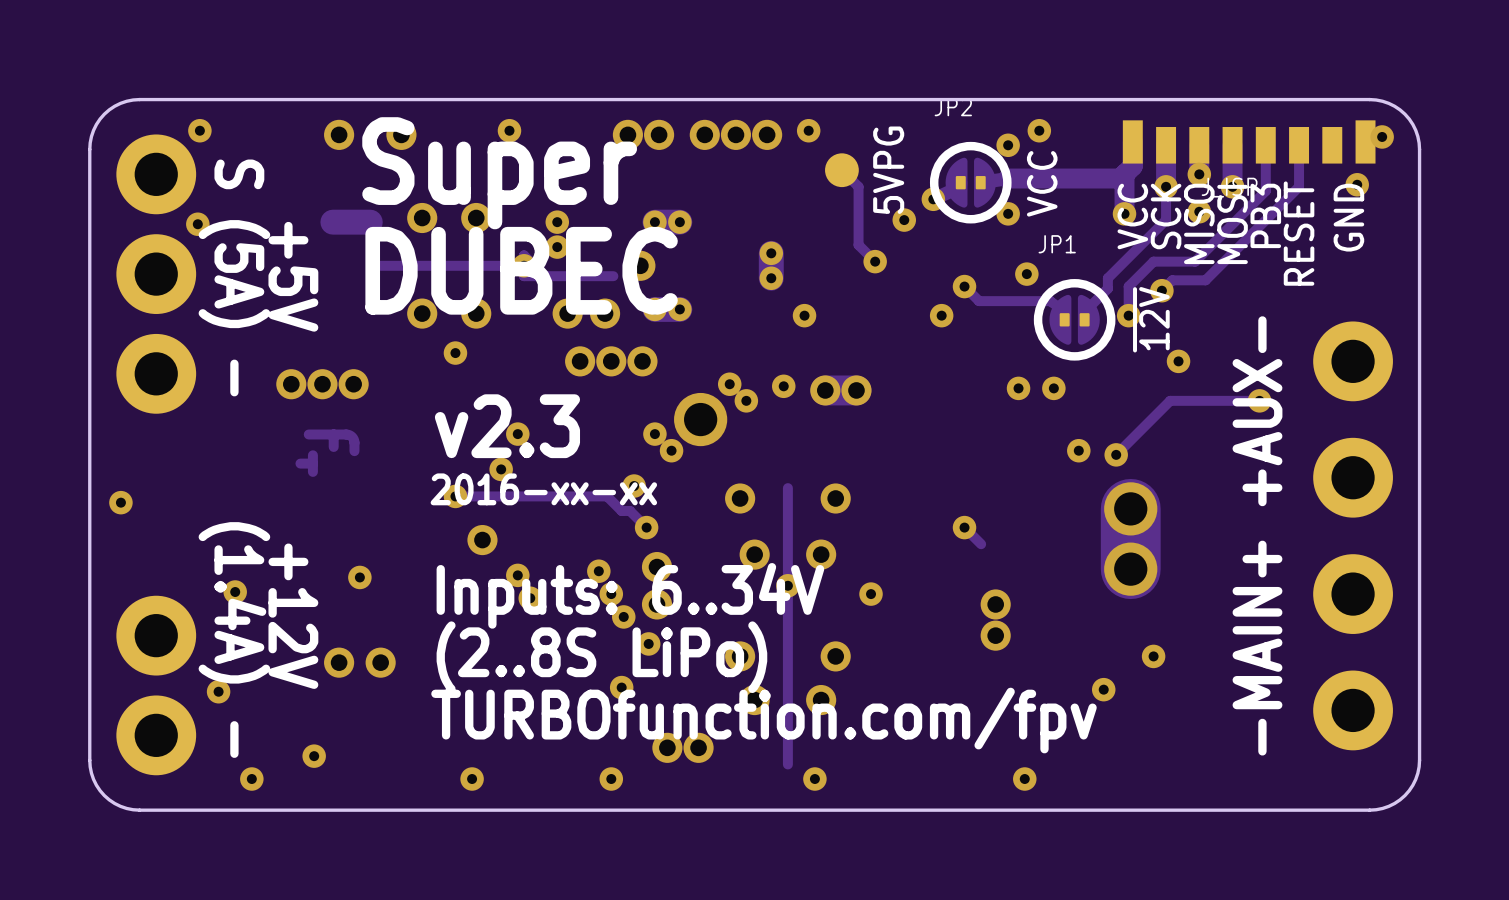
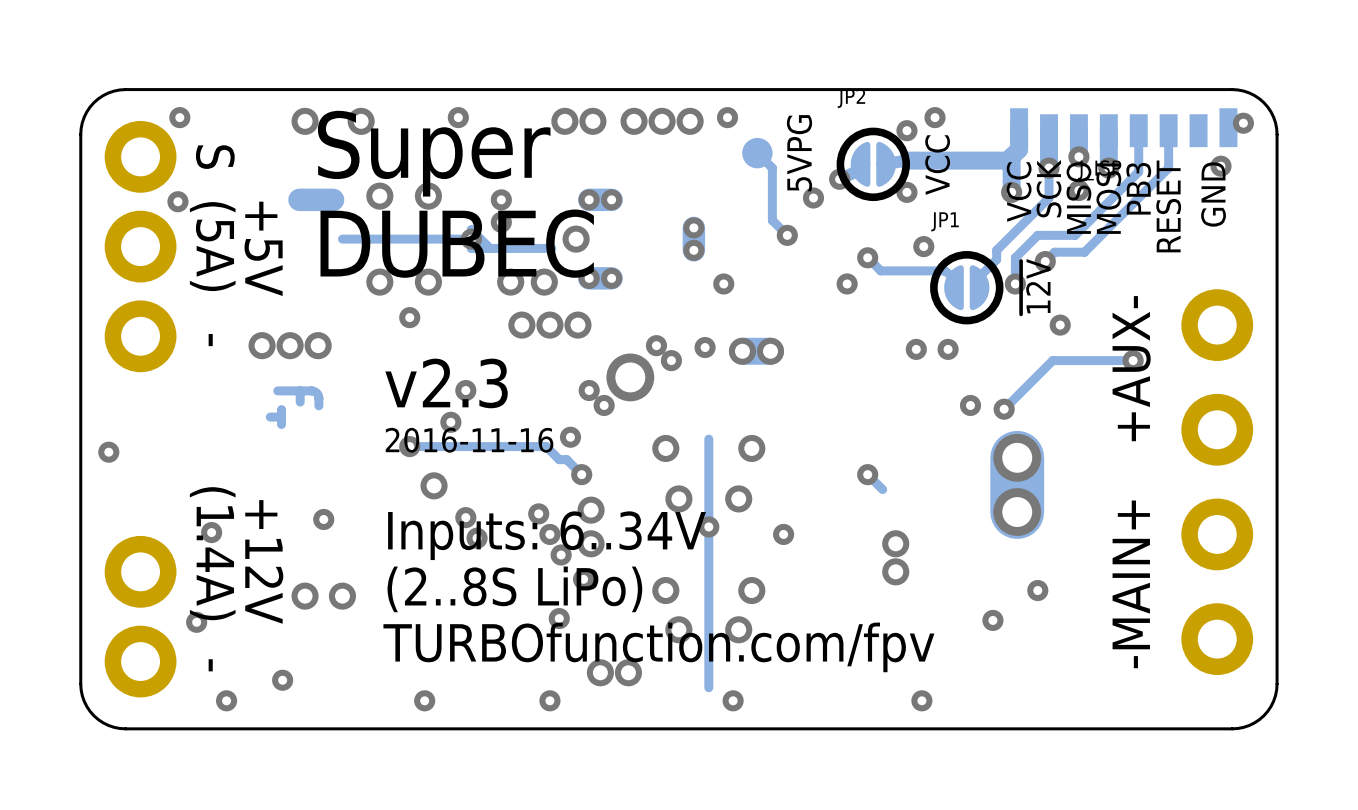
text: 2016-xx-xx (543, 489) -> 2016-11-16 (469, 440)

